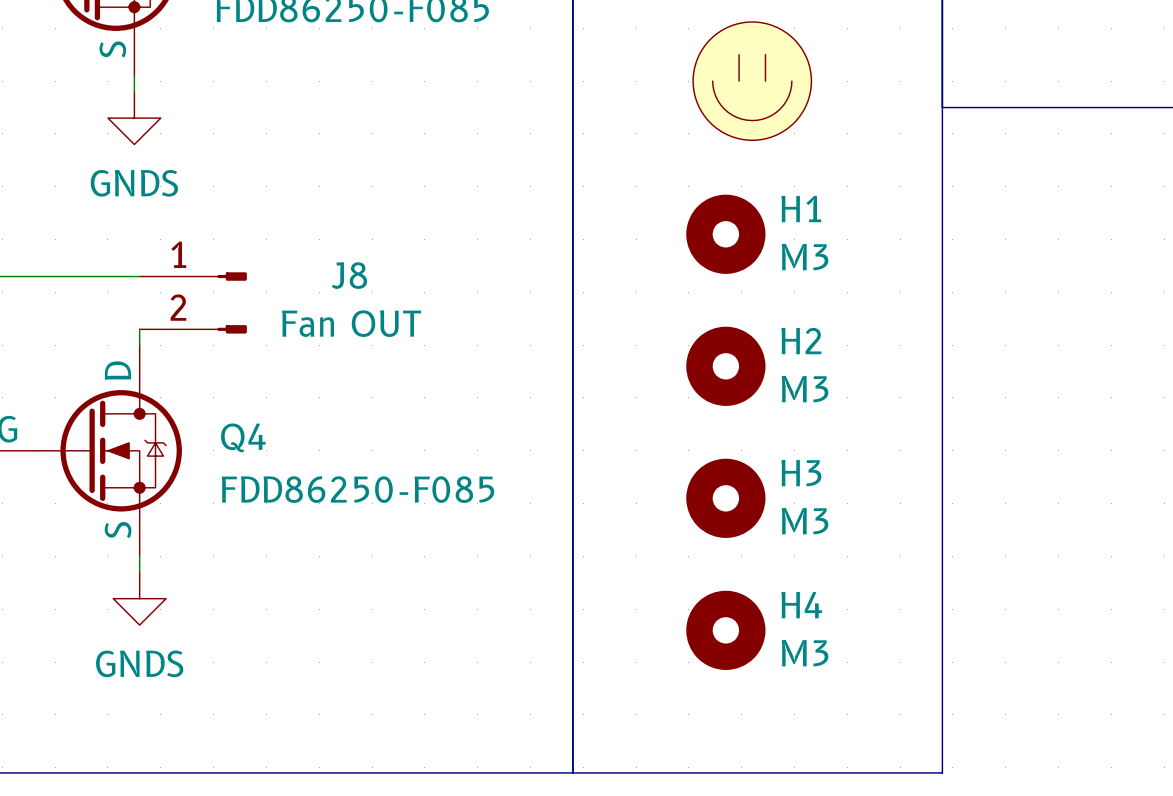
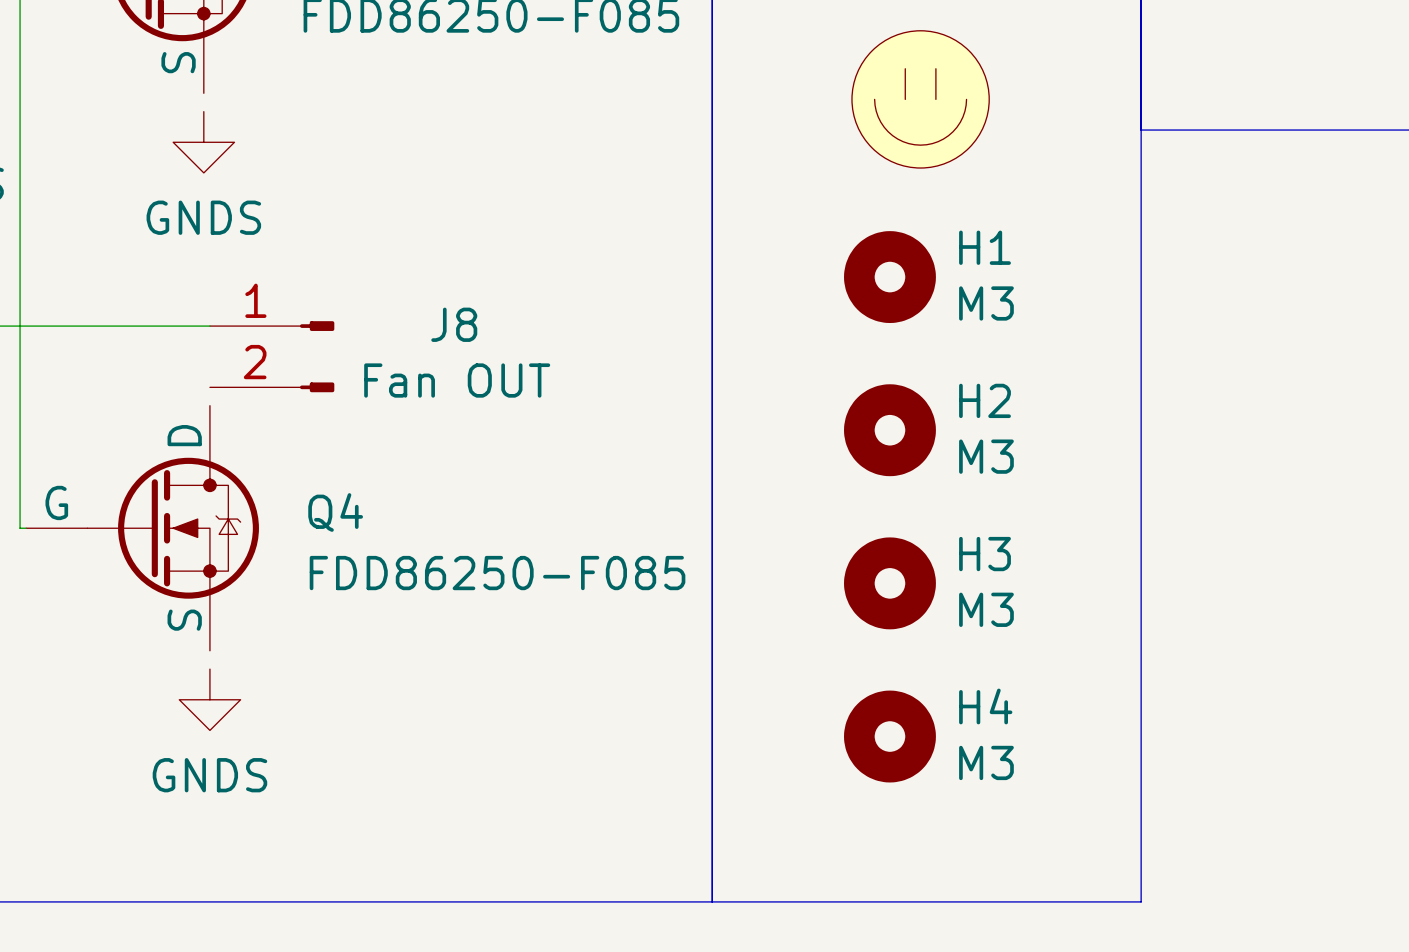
wire: (134, 75) (134, 91) -> none
wire: (139, 329) (139, 345) -> none
wire: (139, 556) (139, 572) -> none

